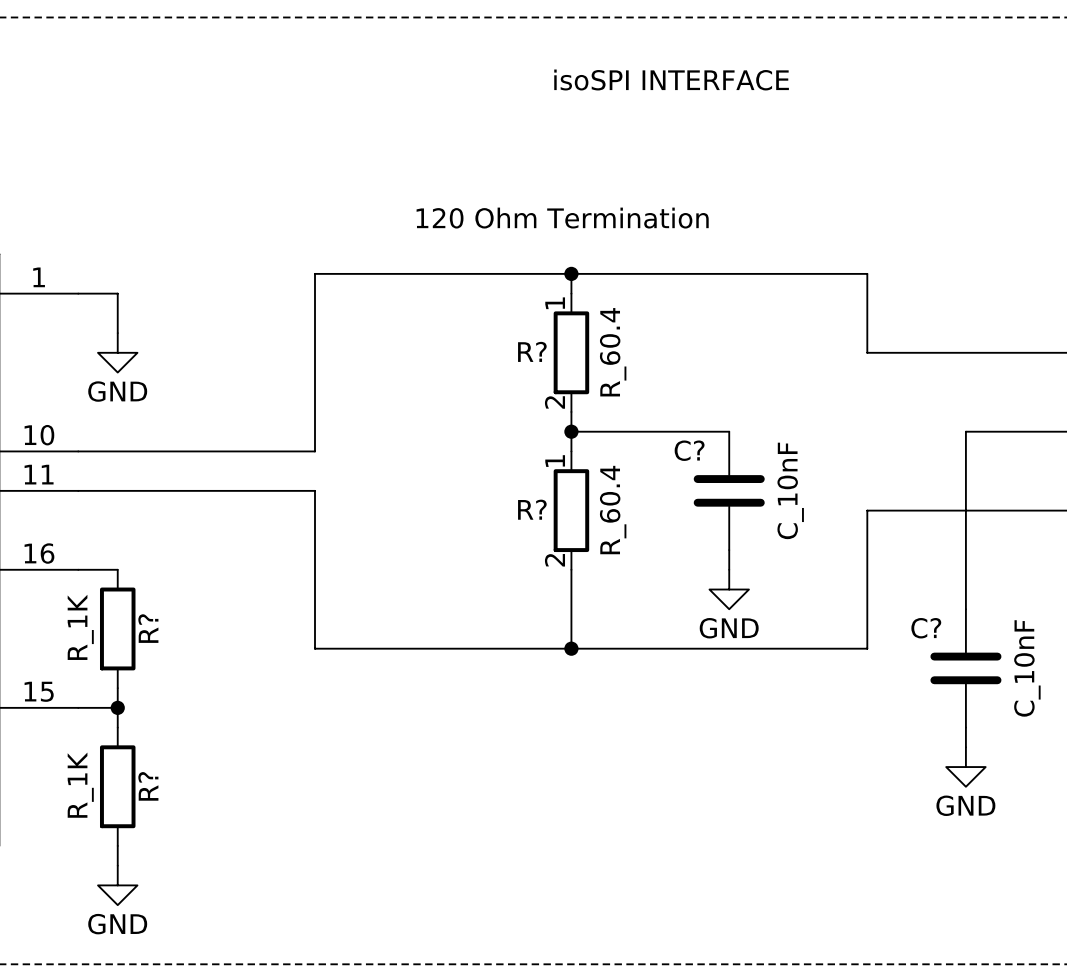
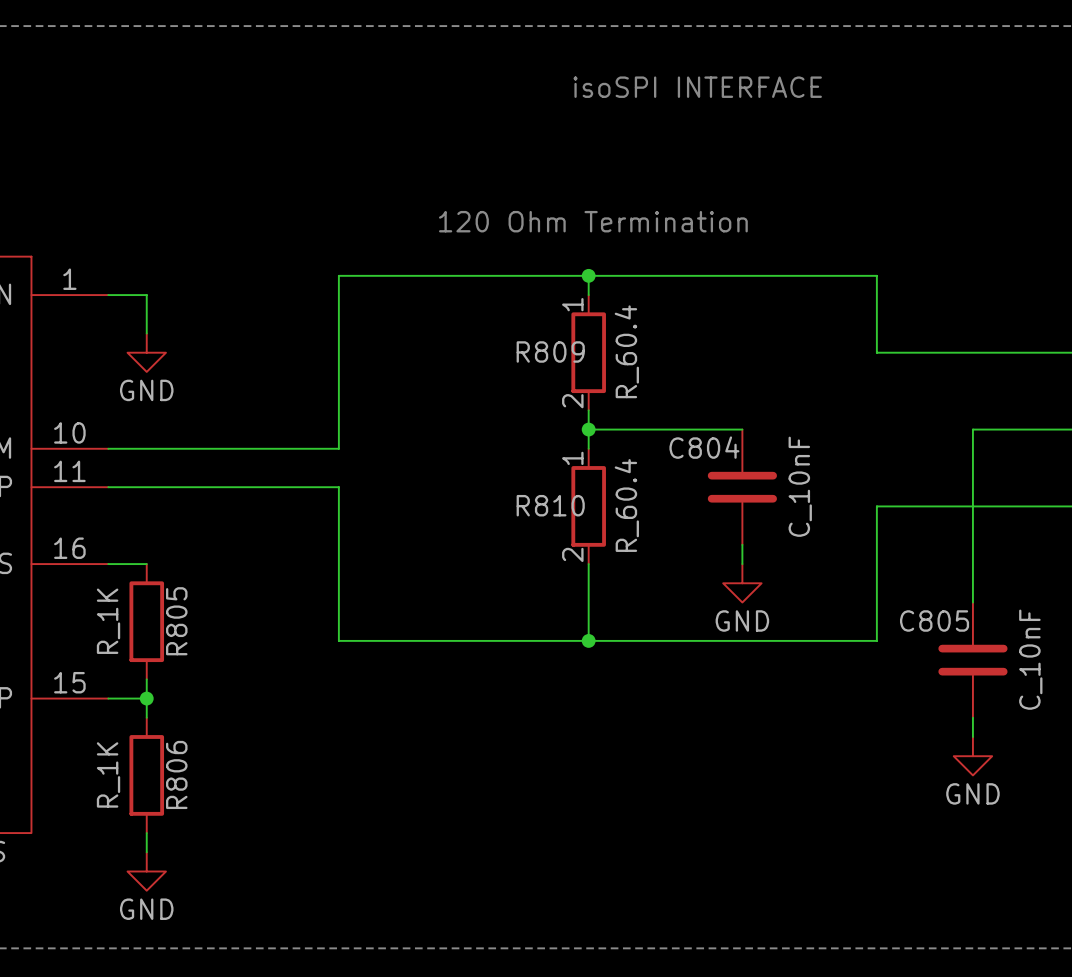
R? name: R? (532, 351) -> R809 (550, 351)
C? name: C? (689, 450) -> C804 (704, 447)
R? name: R? (532, 509) -> R810 (550, 505)
R? name: R? (148, 628) -> R805 (176, 621)
C? name: C? (926, 628) -> C805 (934, 620)
R? name: R? (148, 786) -> R806 (176, 774)

